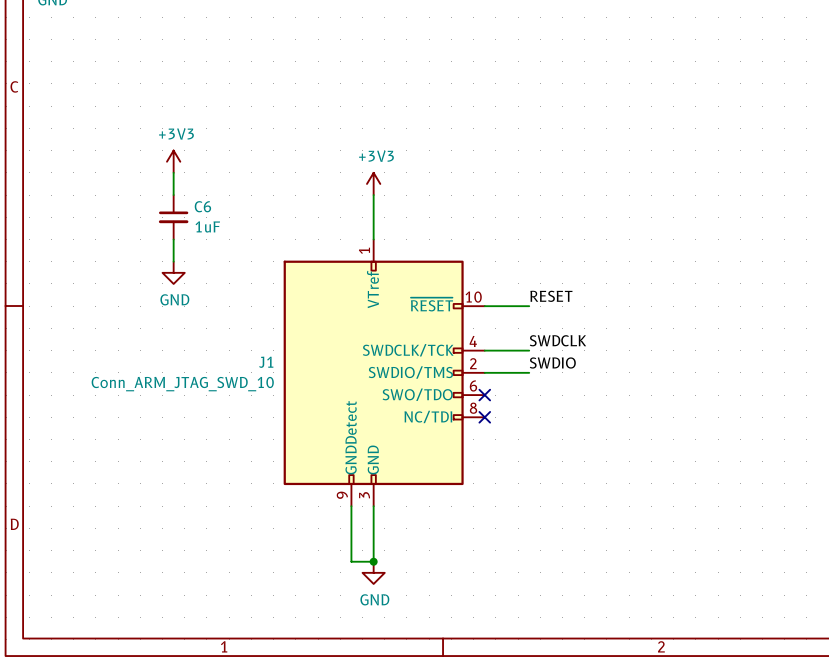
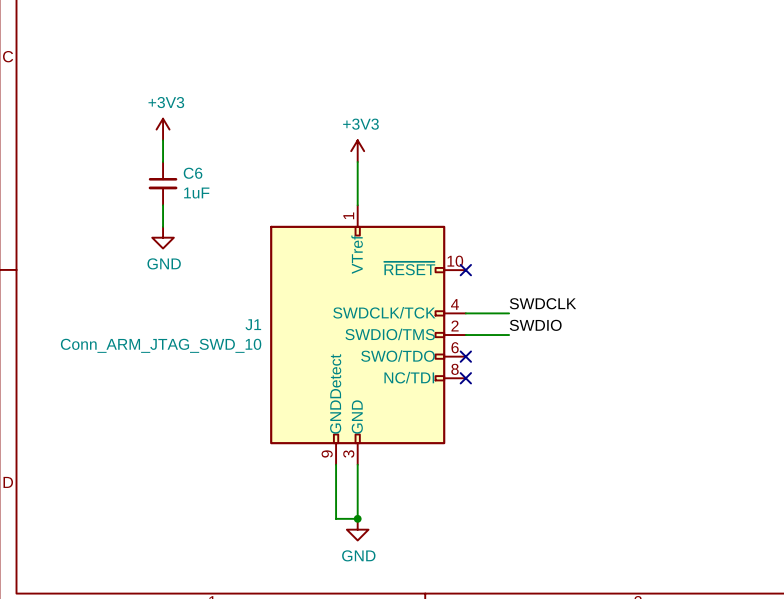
label: RESET (551, 296) -> none
wire: (484, 306) (529, 306) -> none
no-connect mark: none -> (465, 270)

